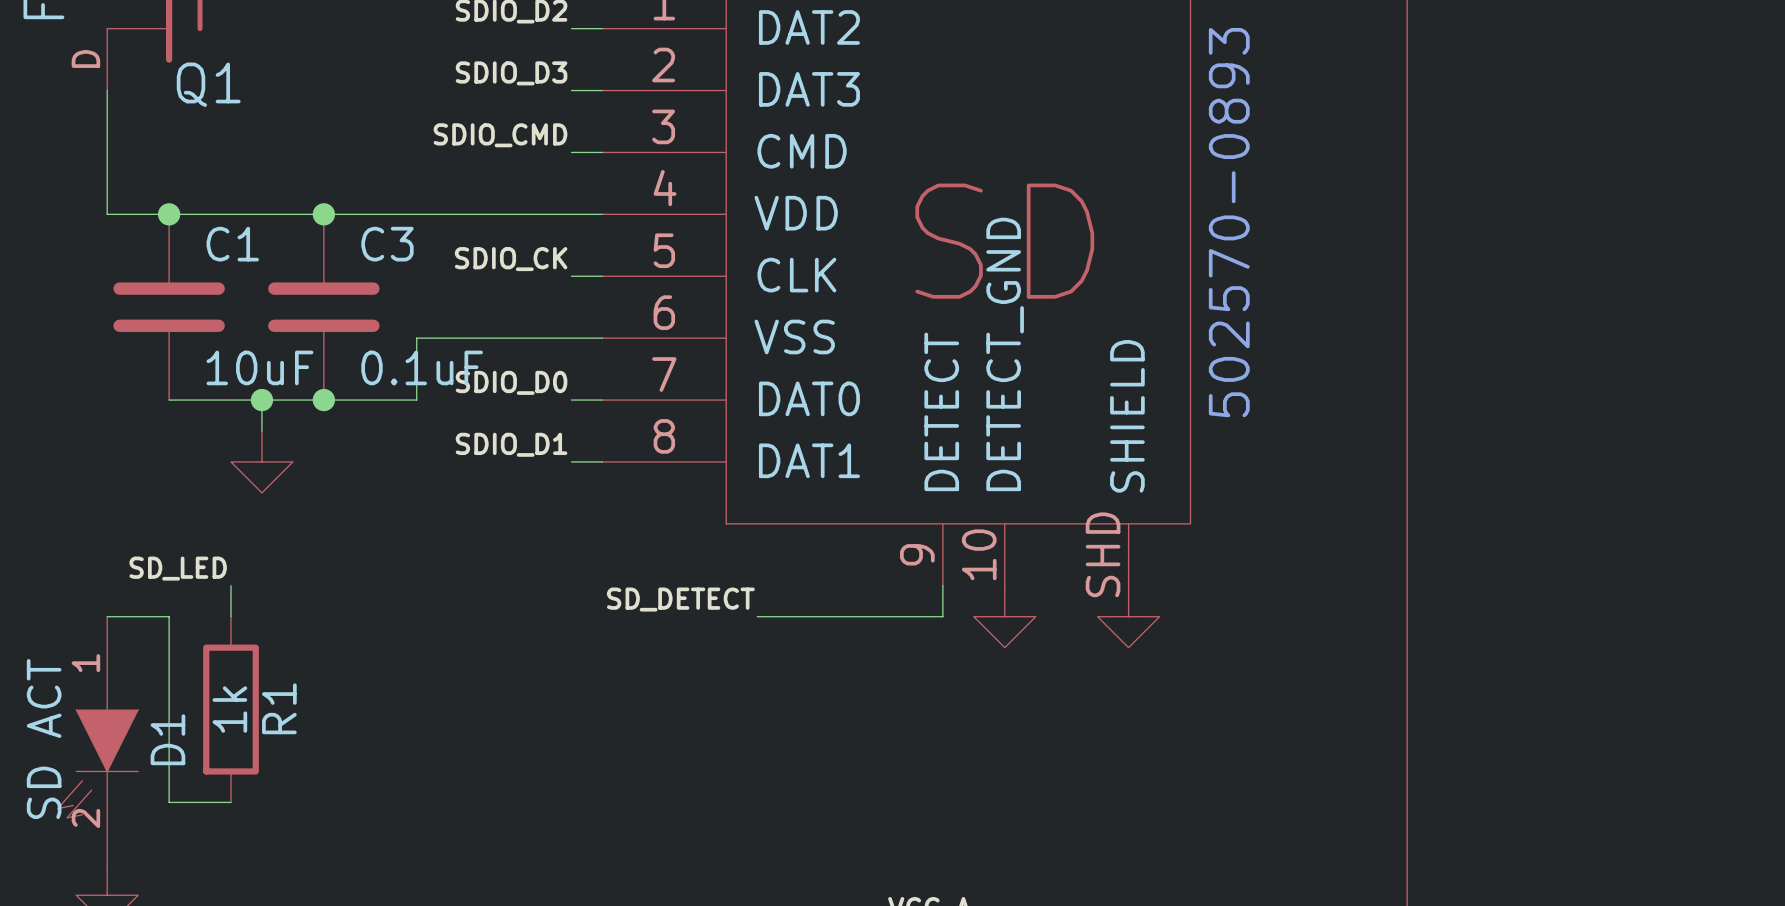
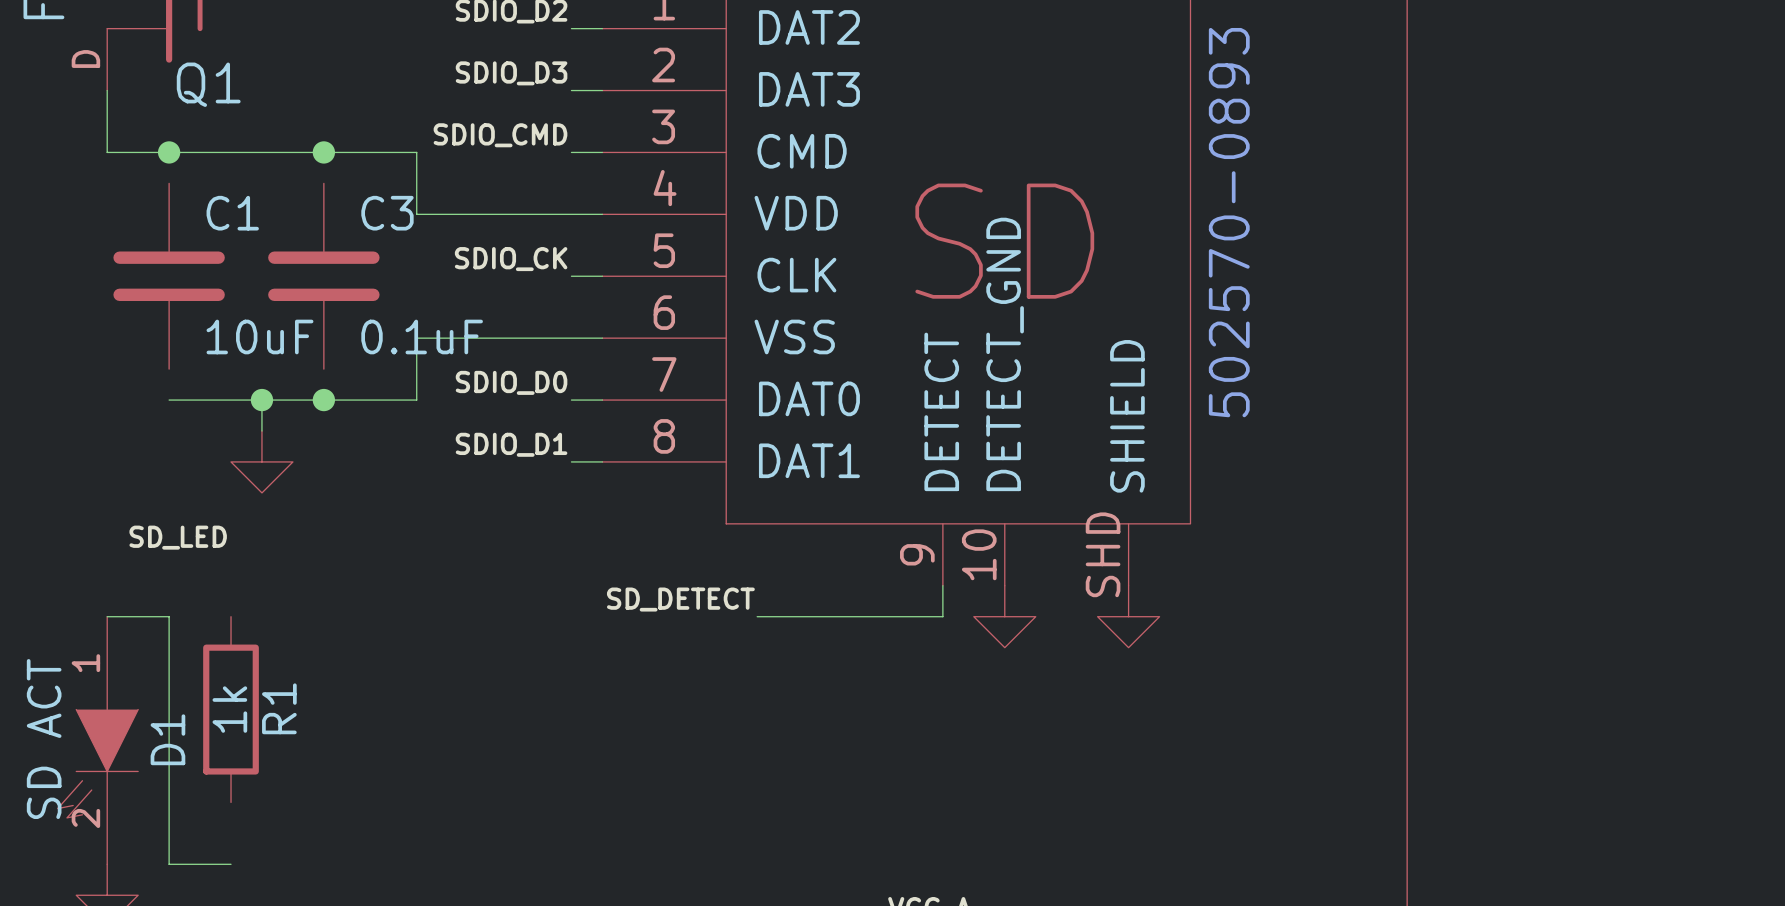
wire: (107, 152) (107, 214) (416, 214) -> (107, 152) (416, 152) (416, 214)
junction position: (169, 214) -> (169, 152)
junction position: (323, 214) -> (323, 152)
C1 position: (169, 307) -> (169, 276)
C3 position: (323, 307) -> (323, 276)
label position: SD_LED (178, 568) -> SD_LED (178, 537)
wire: (231, 585) (231, 616) -> none
wire: (169, 802) (231, 802) -> (169, 802) (169, 864) (231, 864)

